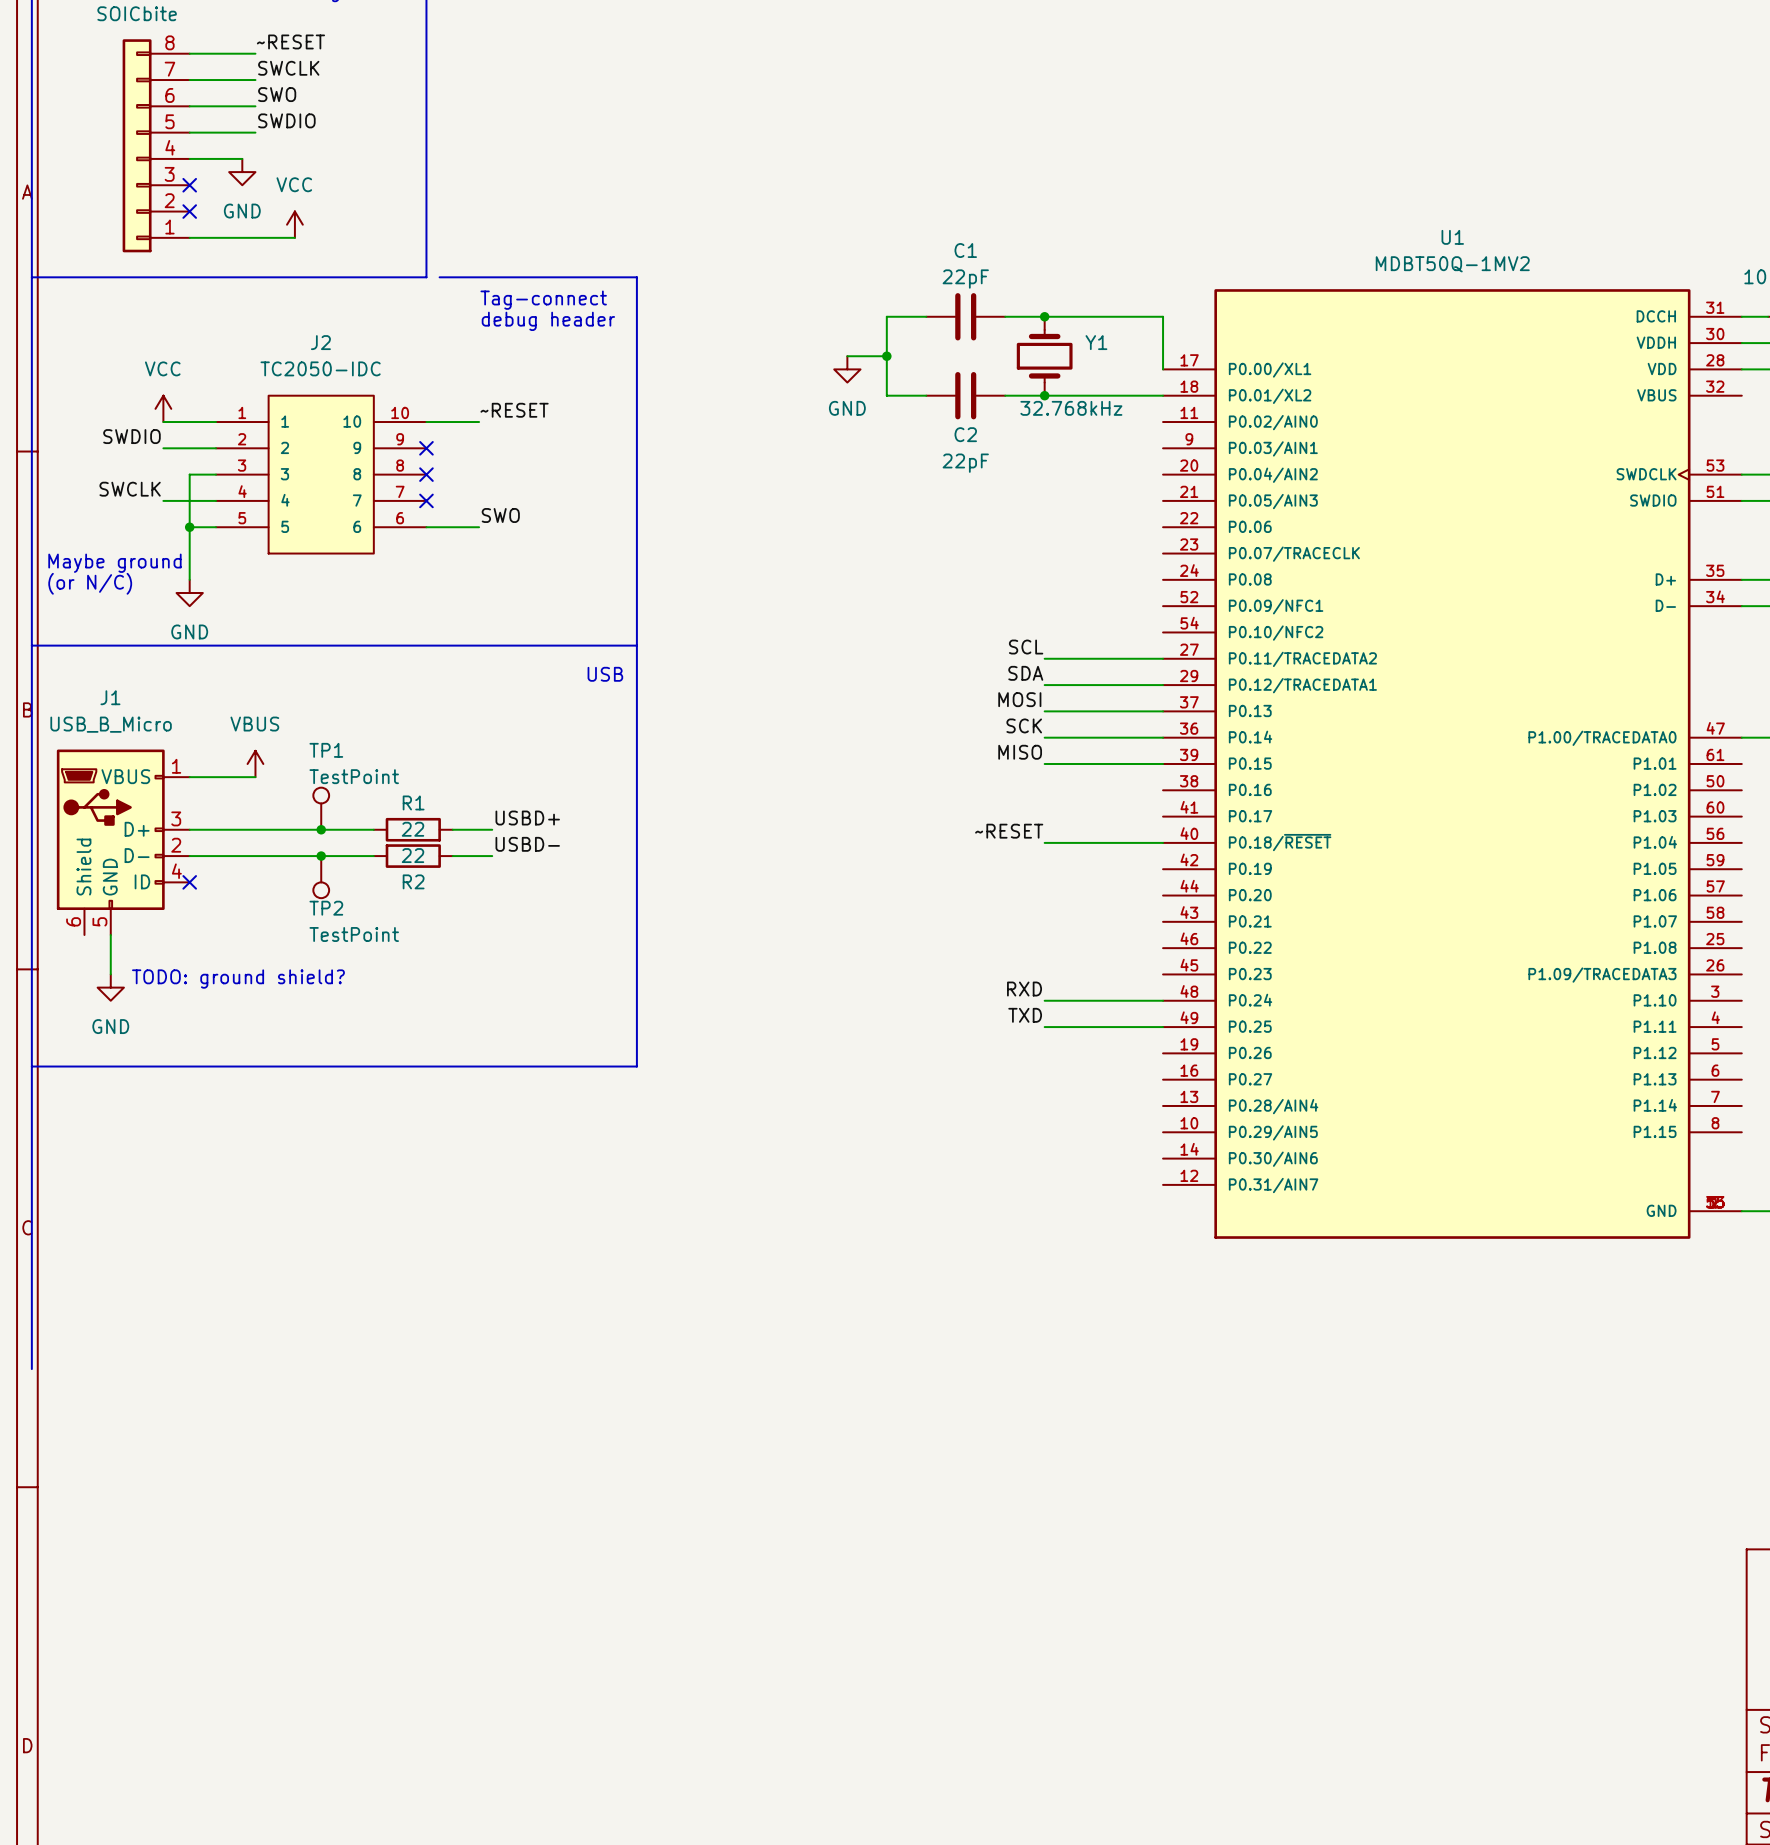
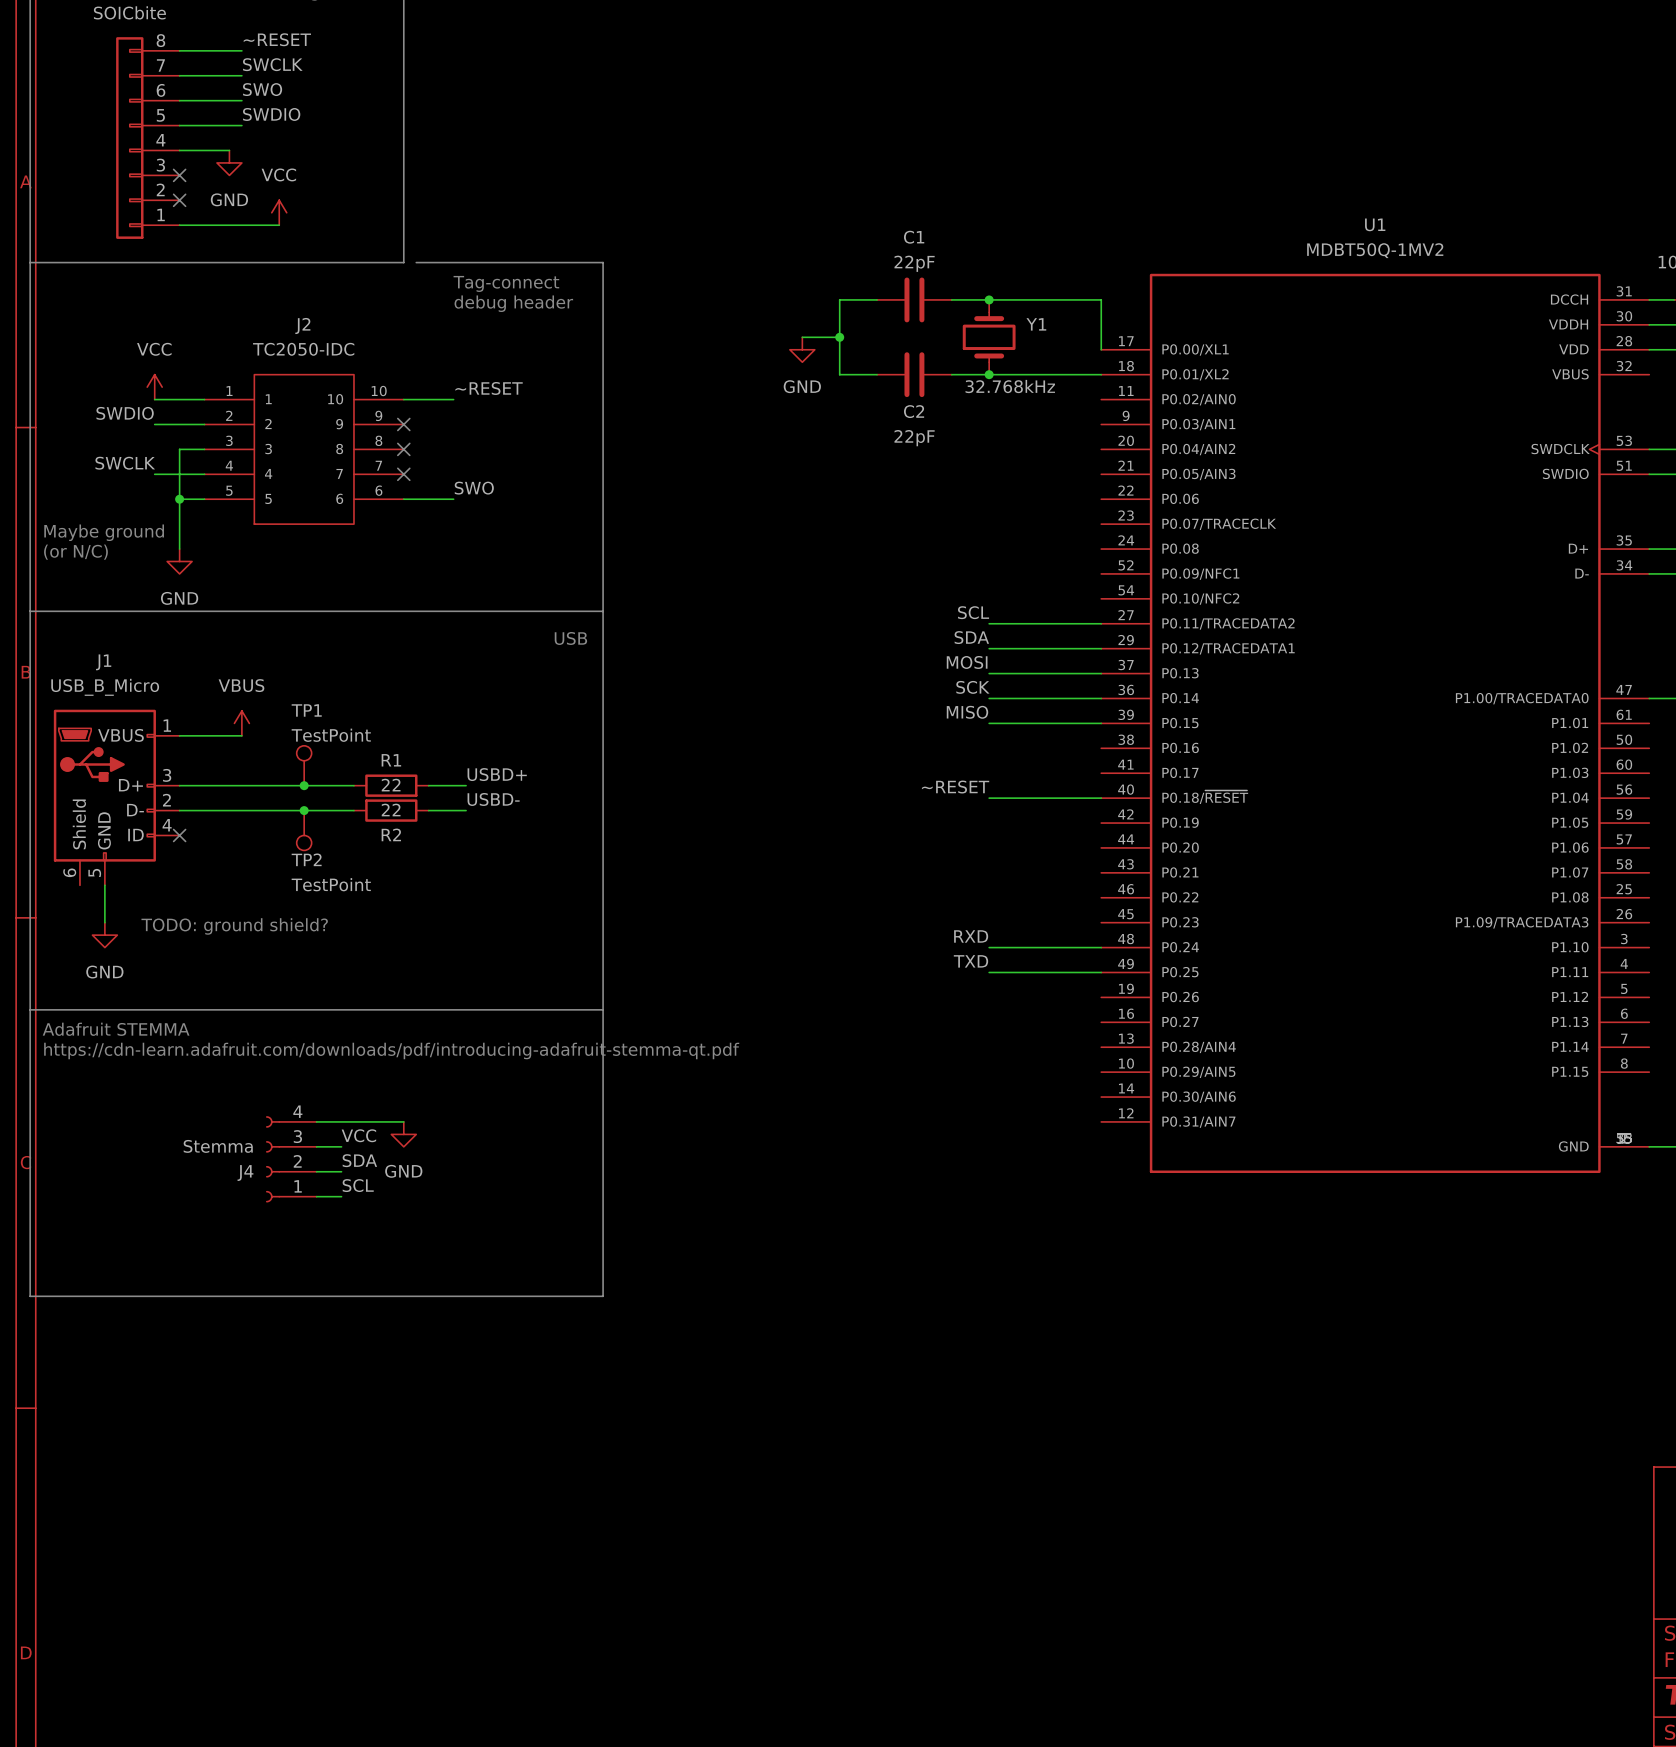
line: none -> (603, 1009) (603, 1296) (30, 1296)
text: none -> Adafruit STEMMA (116, 1029)
text: none -> https://cdn-learn.adafruit.com/downloads/pdf/introducing-adafruit-stemma-qt.pdf (391, 1050)
wire: none -> (316, 1121) (403, 1121)
power symbol: none -> GND (403, 1134)
label: none -> VCC (358, 1135)
wire: none -> (316, 1146) (341, 1146)
J4: none -> Stemma (291, 1159)
label: none -> SDA (359, 1160)
wire: none -> (316, 1171) (341, 1171)
label: none -> SCL (358, 1185)
wire: none -> (316, 1196) (341, 1196)

